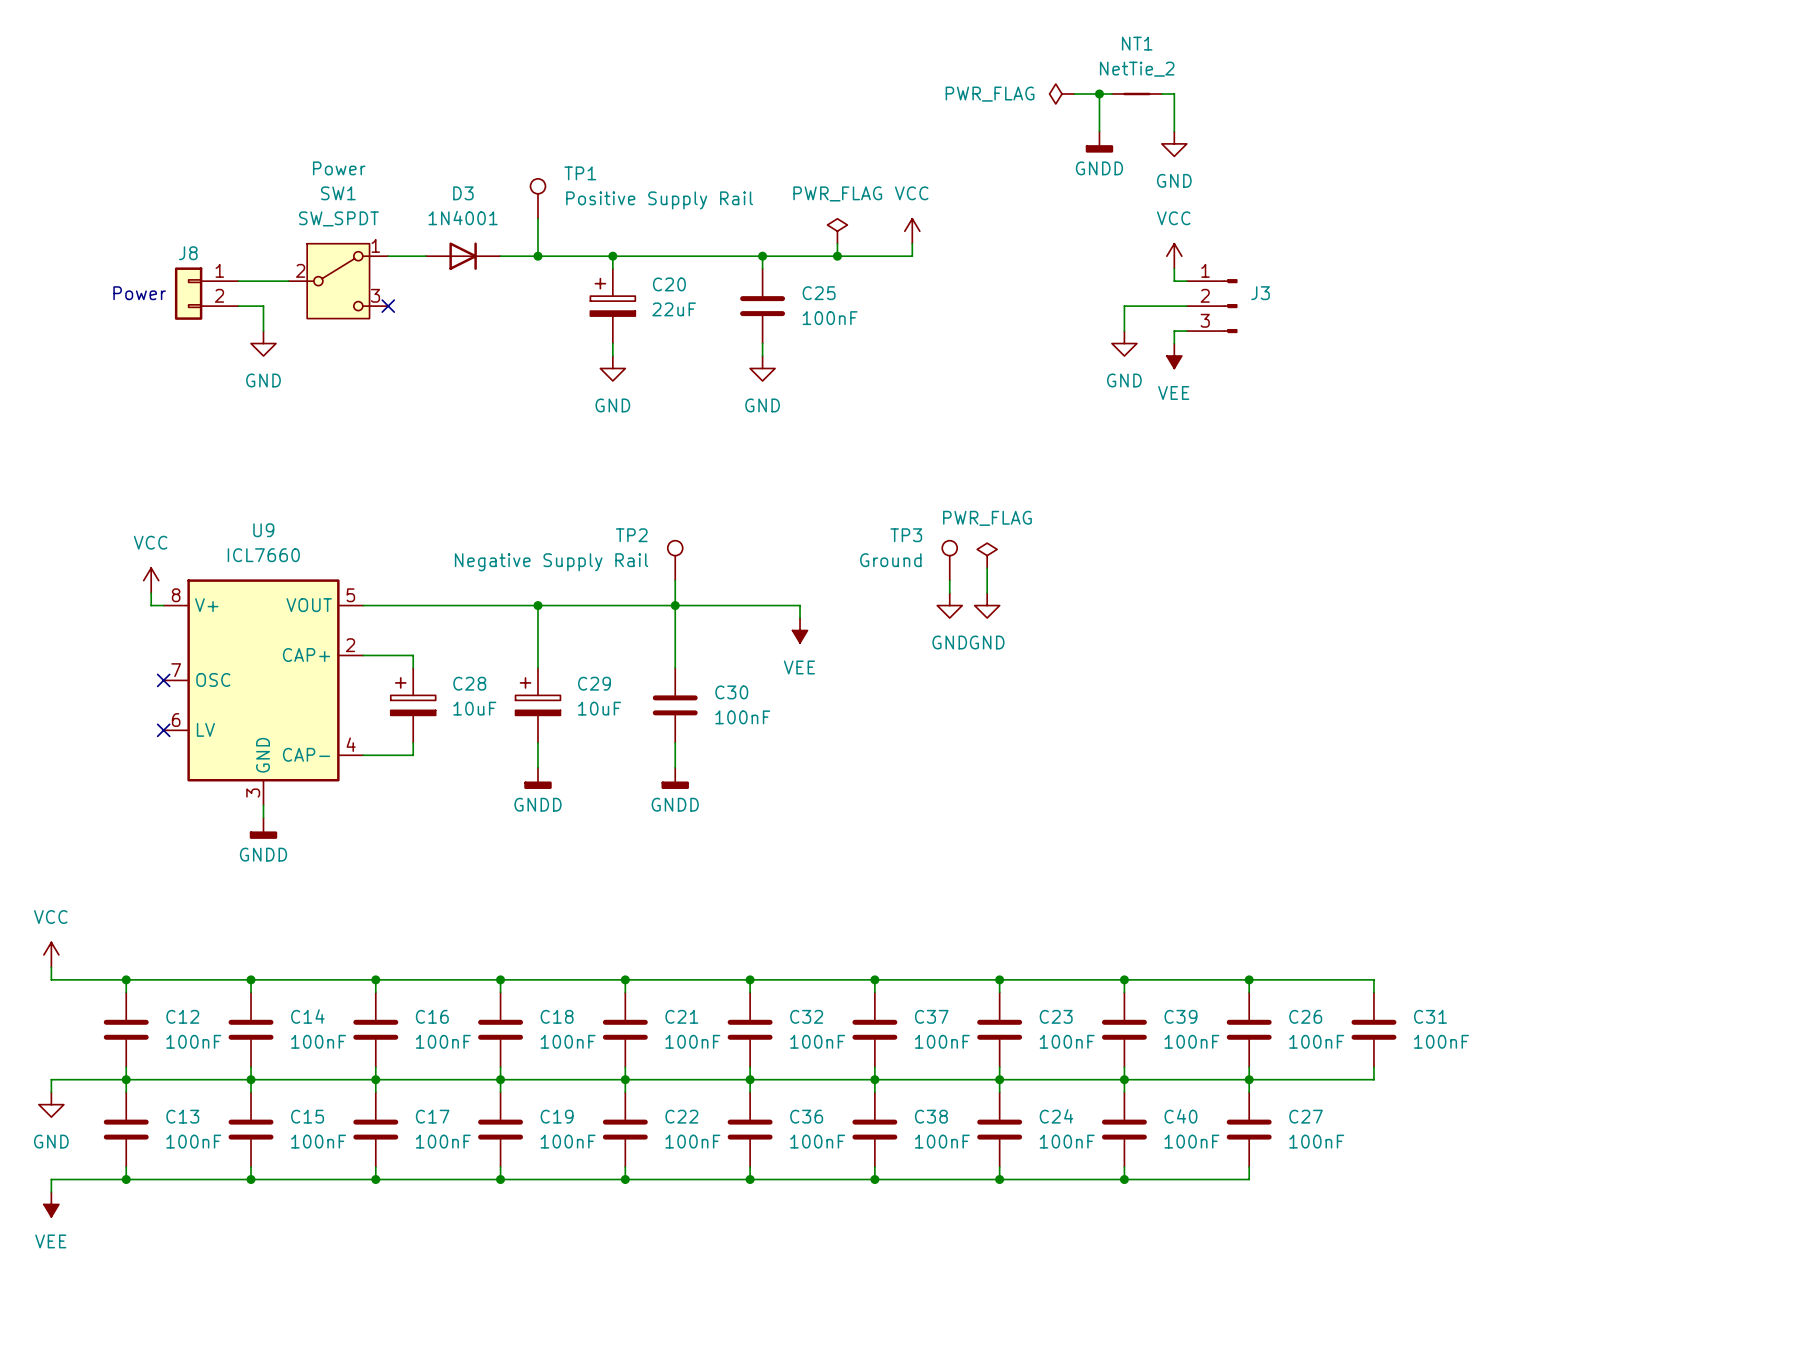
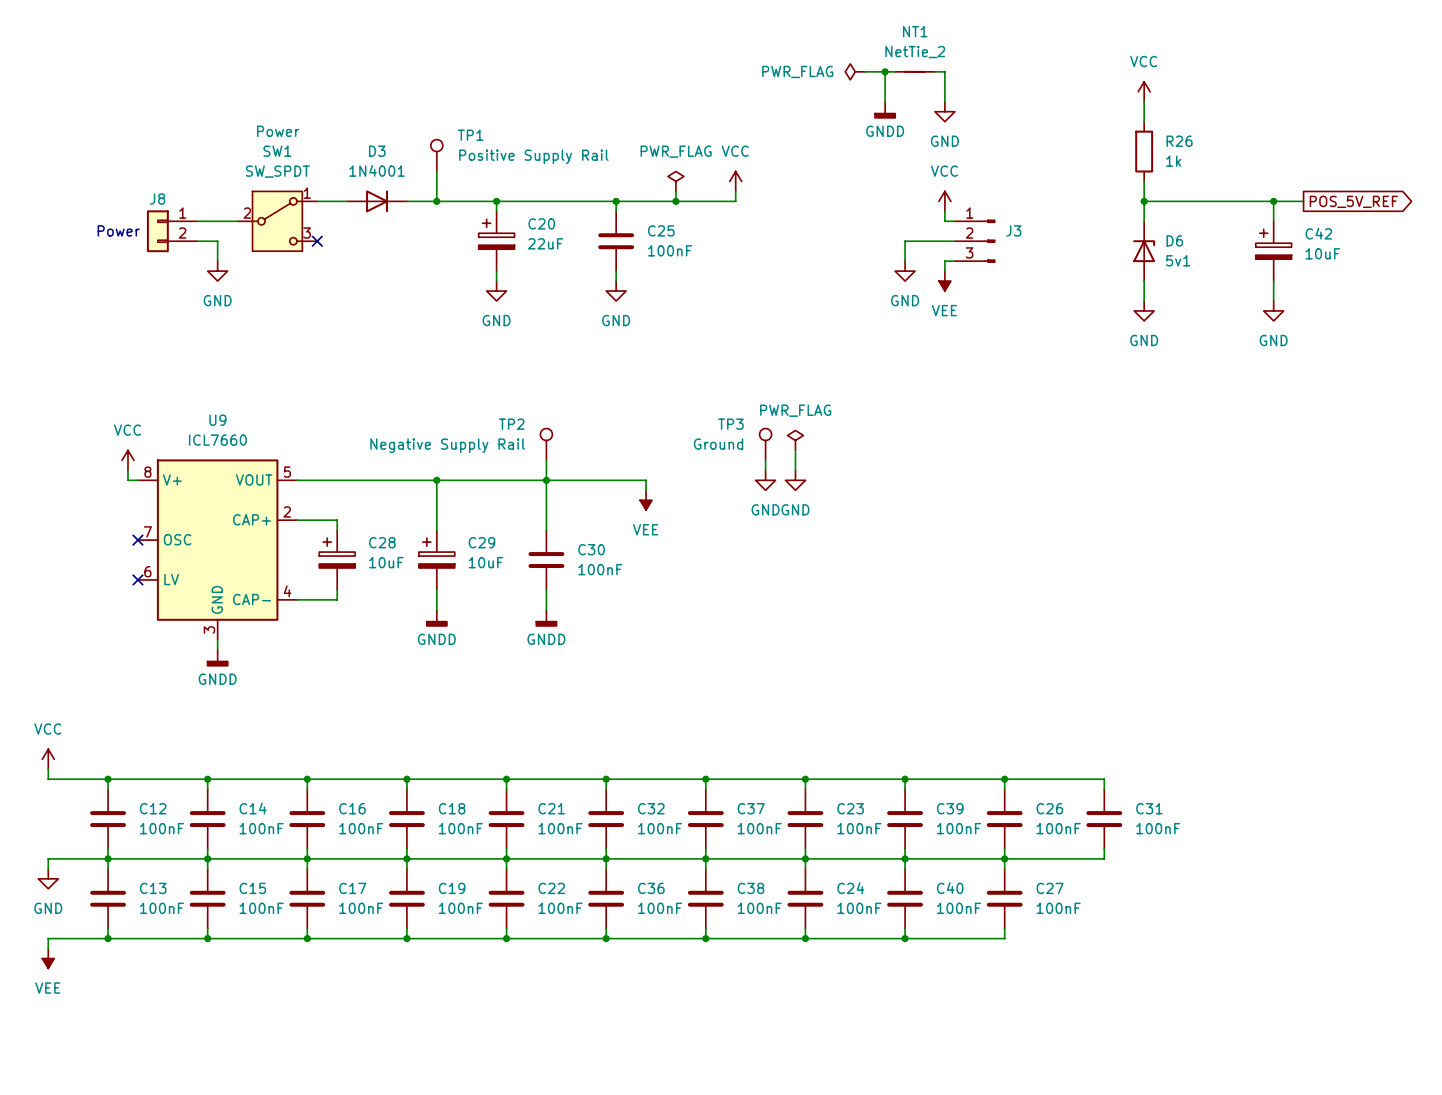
power symbol: none -> VCC (1144, 91)
wire: none -> (1144, 101) (1144, 121)
R26: none -> 1k (1144, 151)
wire: none -> (1144, 181) (1144, 221)
wire: none -> (1144, 201) (1303, 201)
junction: none -> (1144, 201)
wire: none -> (1273, 201) (1273, 221)
junction: none -> (1273, 201)
global label: none -> POS_5V_REF (1353, 201)
D6: none -> 5v1 (1144, 251)
C42: none -> 10uF (1273, 251)
wire: none -> (1144, 281) (1144, 301)
wire: none -> (1273, 281) (1273, 301)
power symbol: none -> GND (1144, 310)
power symbol: none -> GND (1273, 310)

